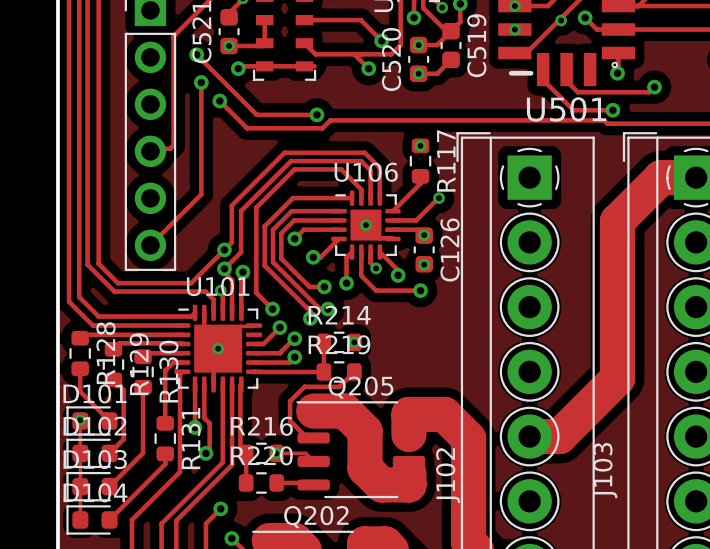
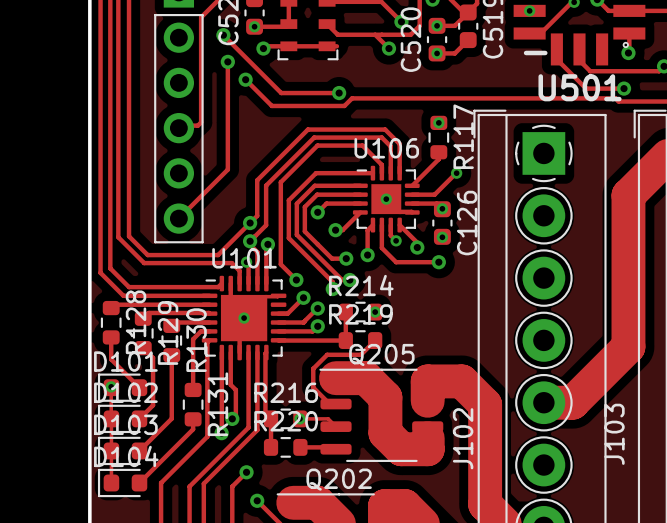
via position: (194, 427) -> (221, 433)
track: none -> (221, 393) (221, 432)

